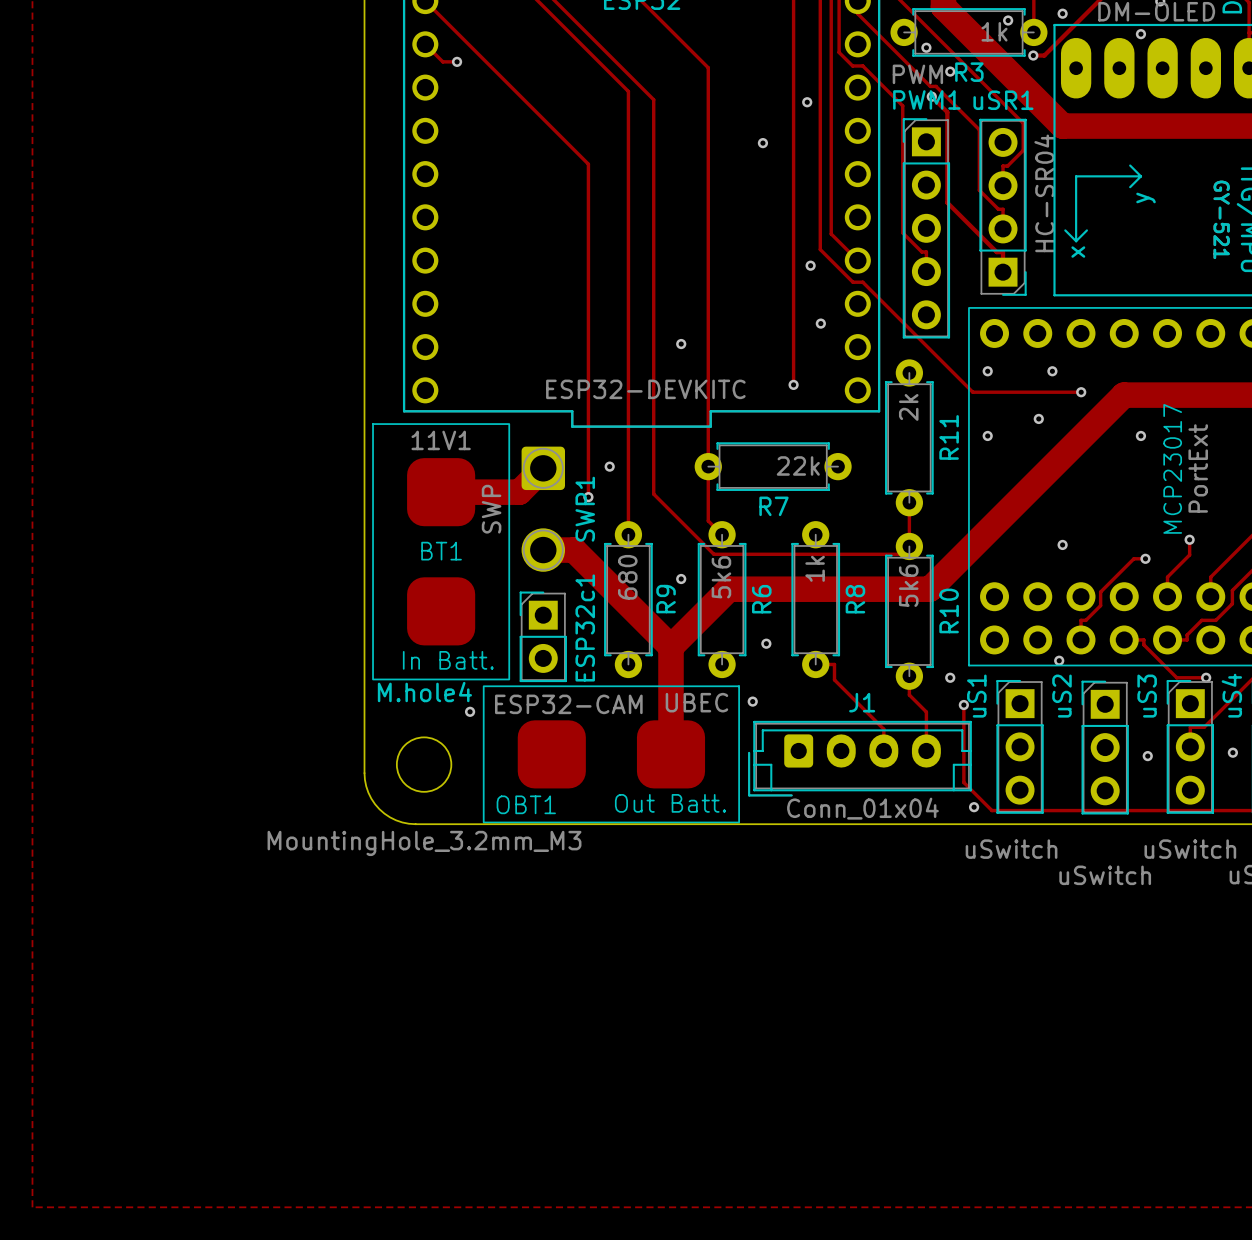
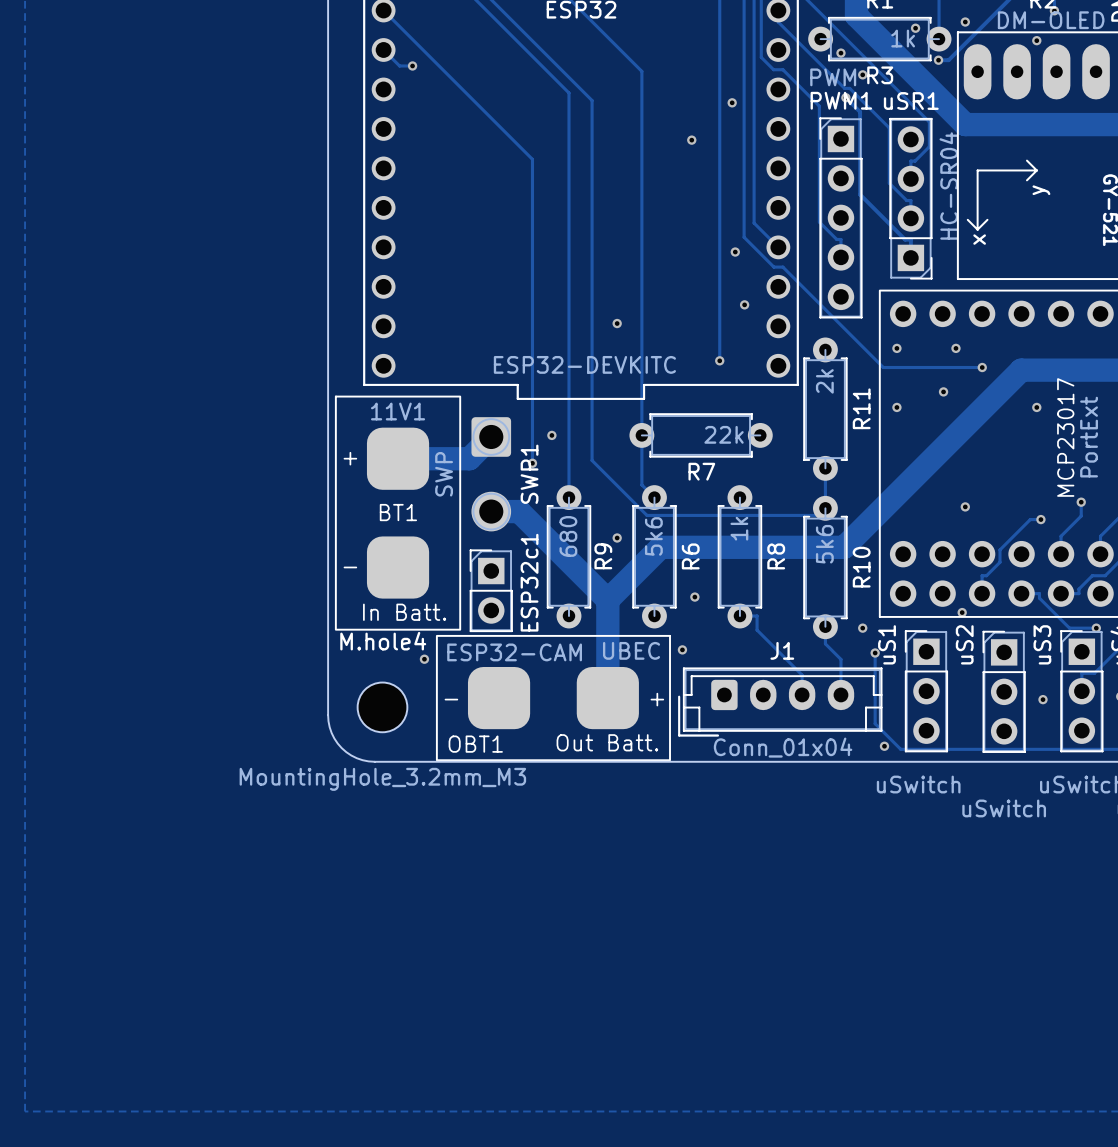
text: none -> + (350, 458)
text: none -> - (350, 567)
text: none -> - (451, 699)
text: none -> + (657, 699)

